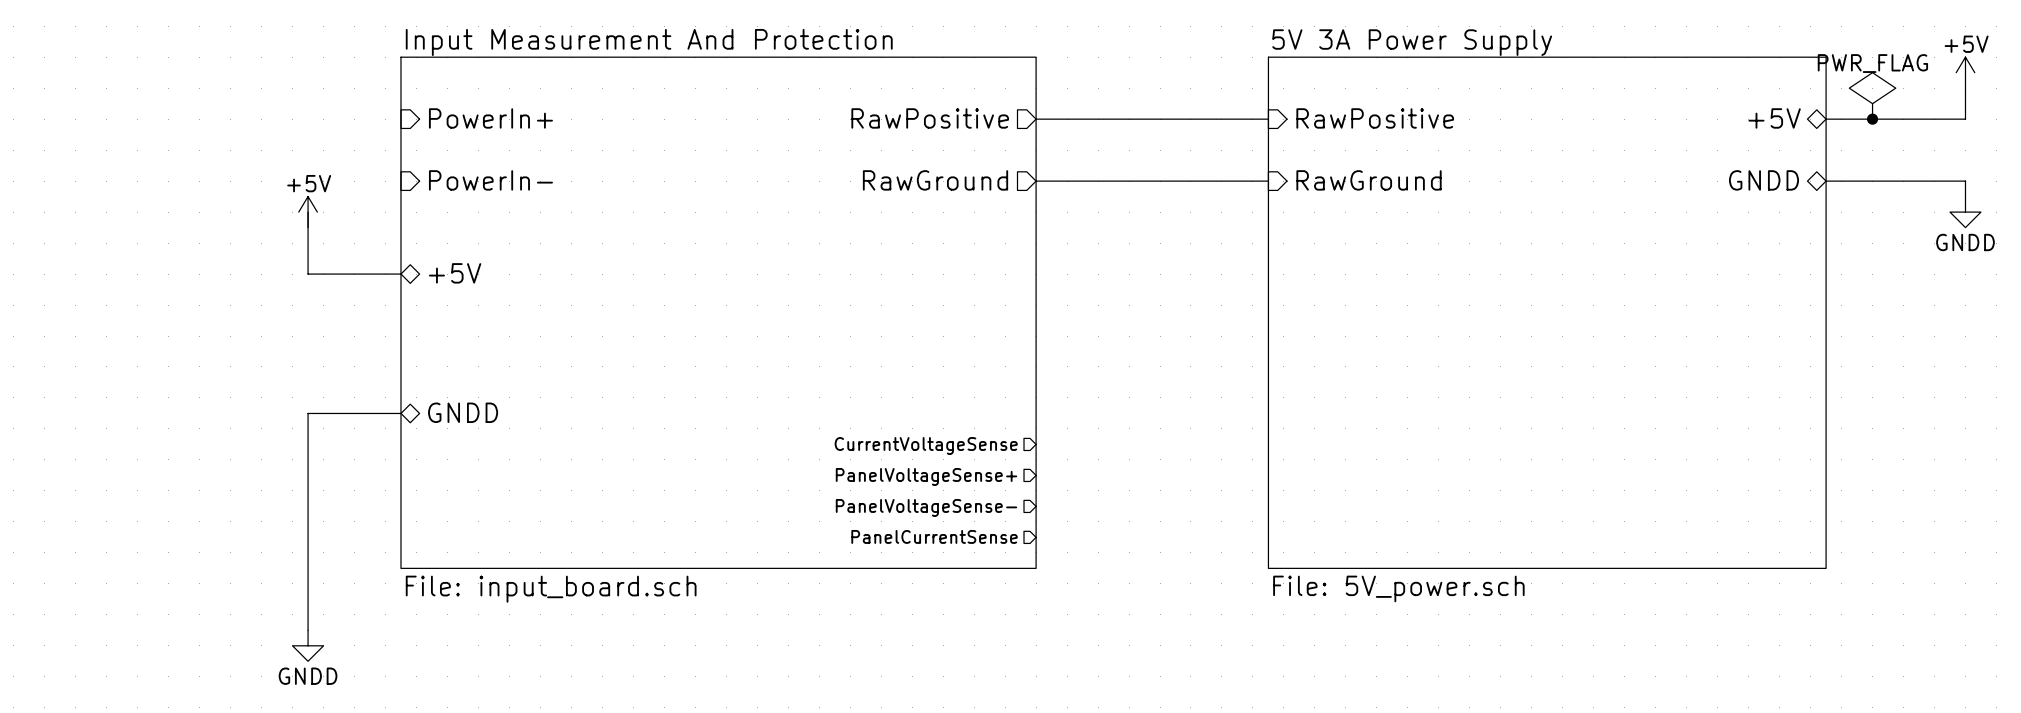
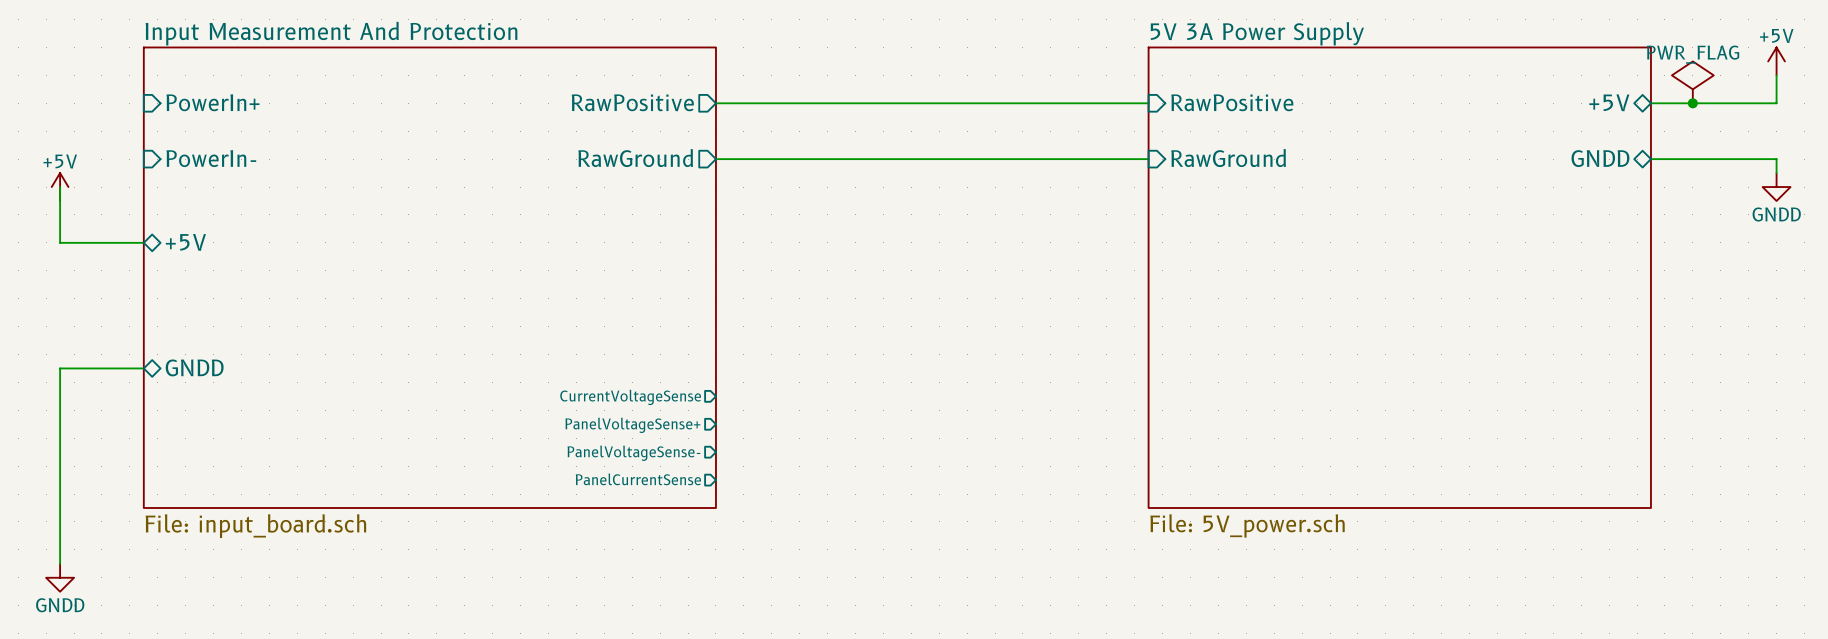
sheet pin position: PowerIn+ (490, 118) -> PowerIn+ (212, 102)
sheet pin position: RawPositive (930, 118) -> RawPositive (632, 102)
wire: none -> (715, 103) (939, 103)
sheet pin position: PowerIn- (490, 180) -> PowerIn- (211, 158)
sheet pin position: RawGround (935, 180) -> RawGround (635, 158)
wire: none -> (715, 159) (939, 159)
wire: (308, 212) (308, 274) (400, 274) -> (60, 187) (60, 242) (143, 242)
power symbol position: +5V (308, 212) -> +5V (60, 187)
sheet pin position: +5V (455, 273) -> +5V (185, 242)
sheet Input Measurement And Protection position: (718, 312) -> (429, 277)
sheet pin position: GNDD (463, 412) -> GNDD (194, 367)
wire: (400, 413) (308, 413) (308, 630) -> (143, 368) (60, 368) (60, 563)
sheet pin position: CurrentVoltageSense (926, 446) -> CurrentVoltageSense (630, 397)
sheet pin position: PanelVoltageSense+ (926, 476) -> PanelVoltageSense+ (632, 425)
sheet pin position: PanelVoltageSense- (926, 507) -> PanelVoltageSense- (633, 453)
sheet pin position: PanelCurrentSense (934, 536) -> PanelCurrentSense (638, 479)
power symbol position: GNDD (308, 645) -> GNDD (60, 577)

